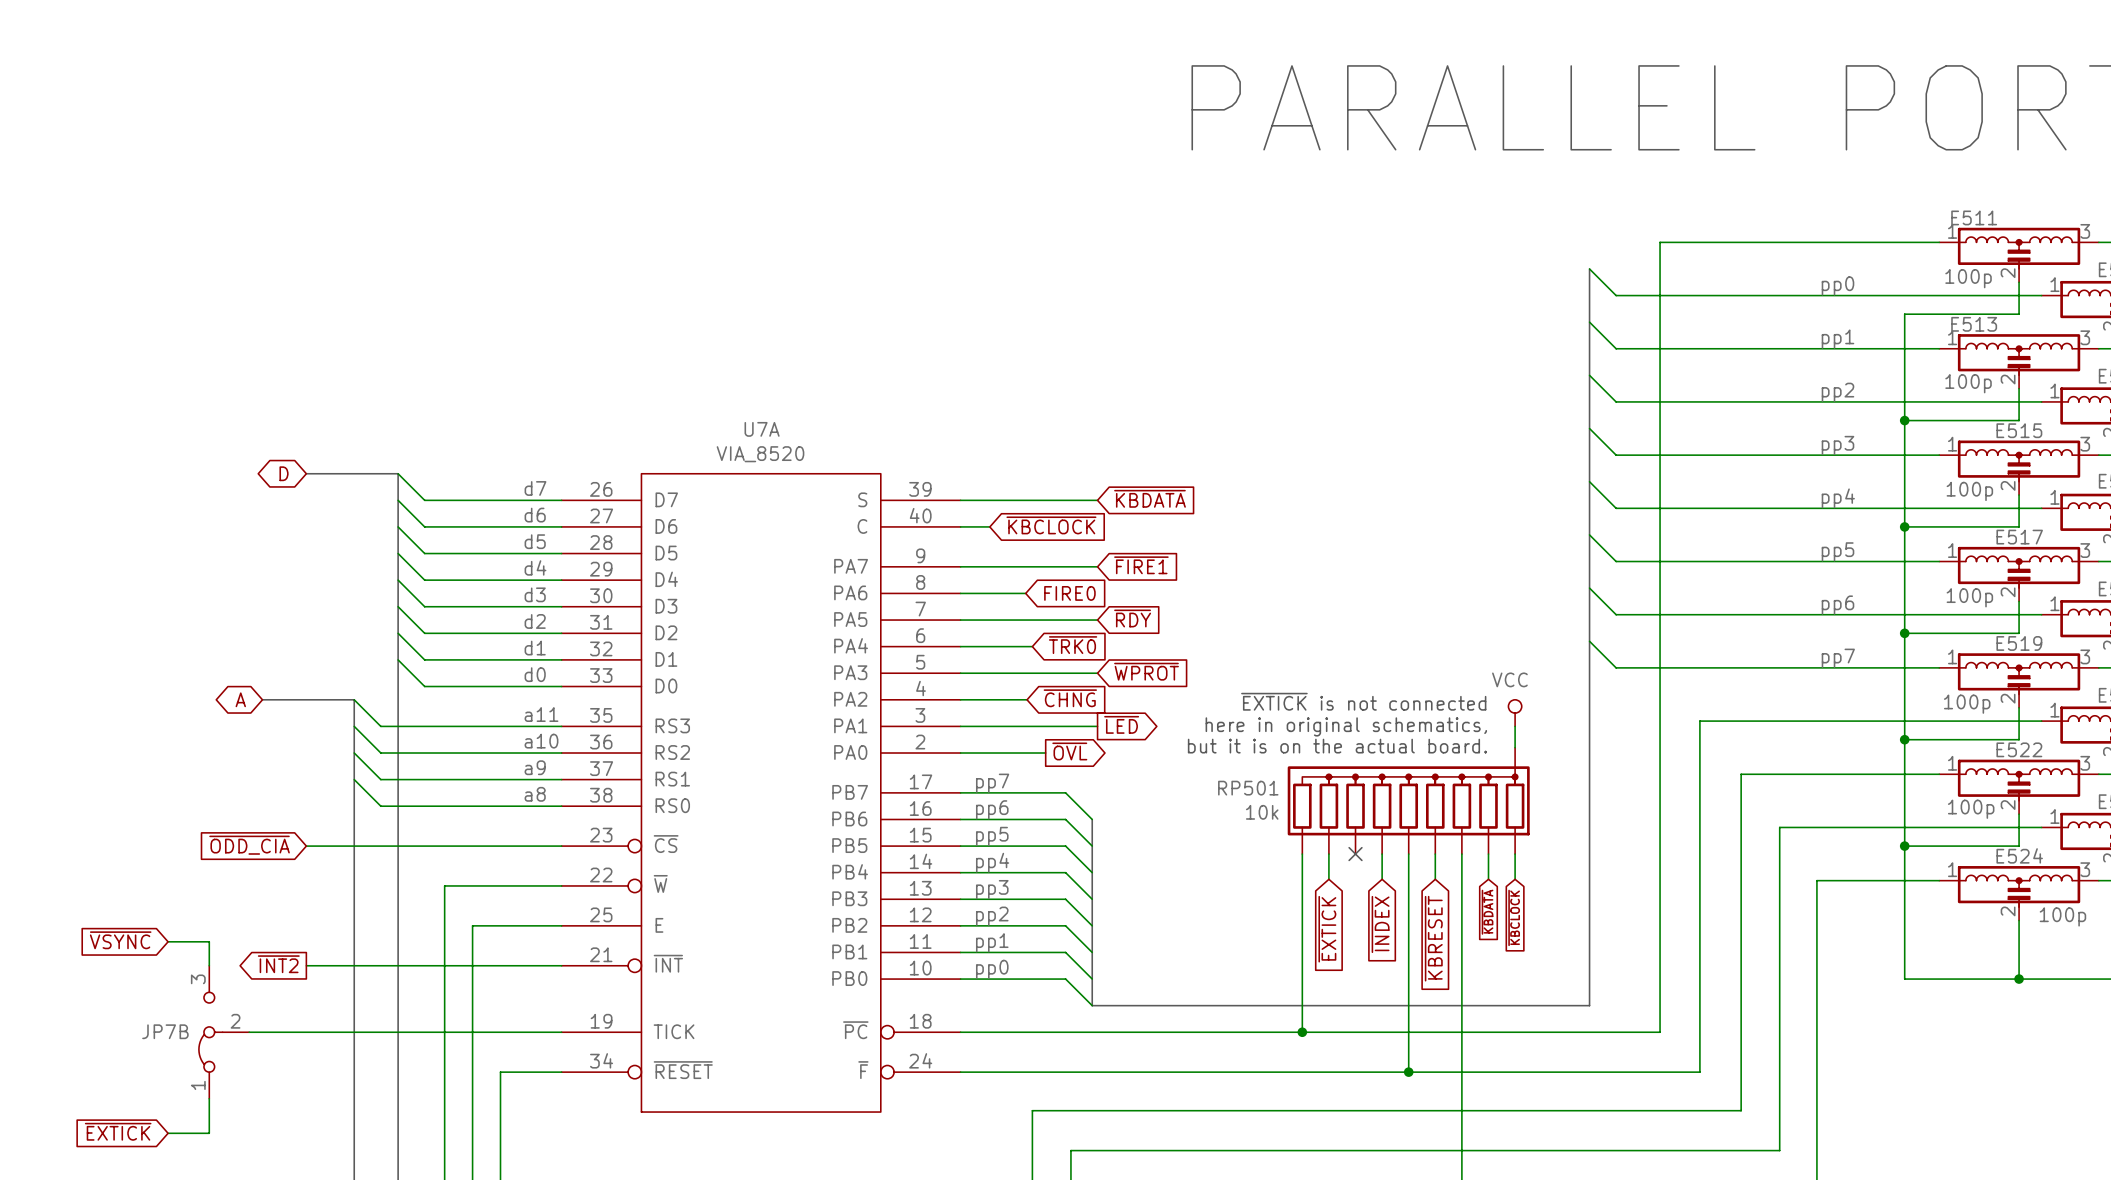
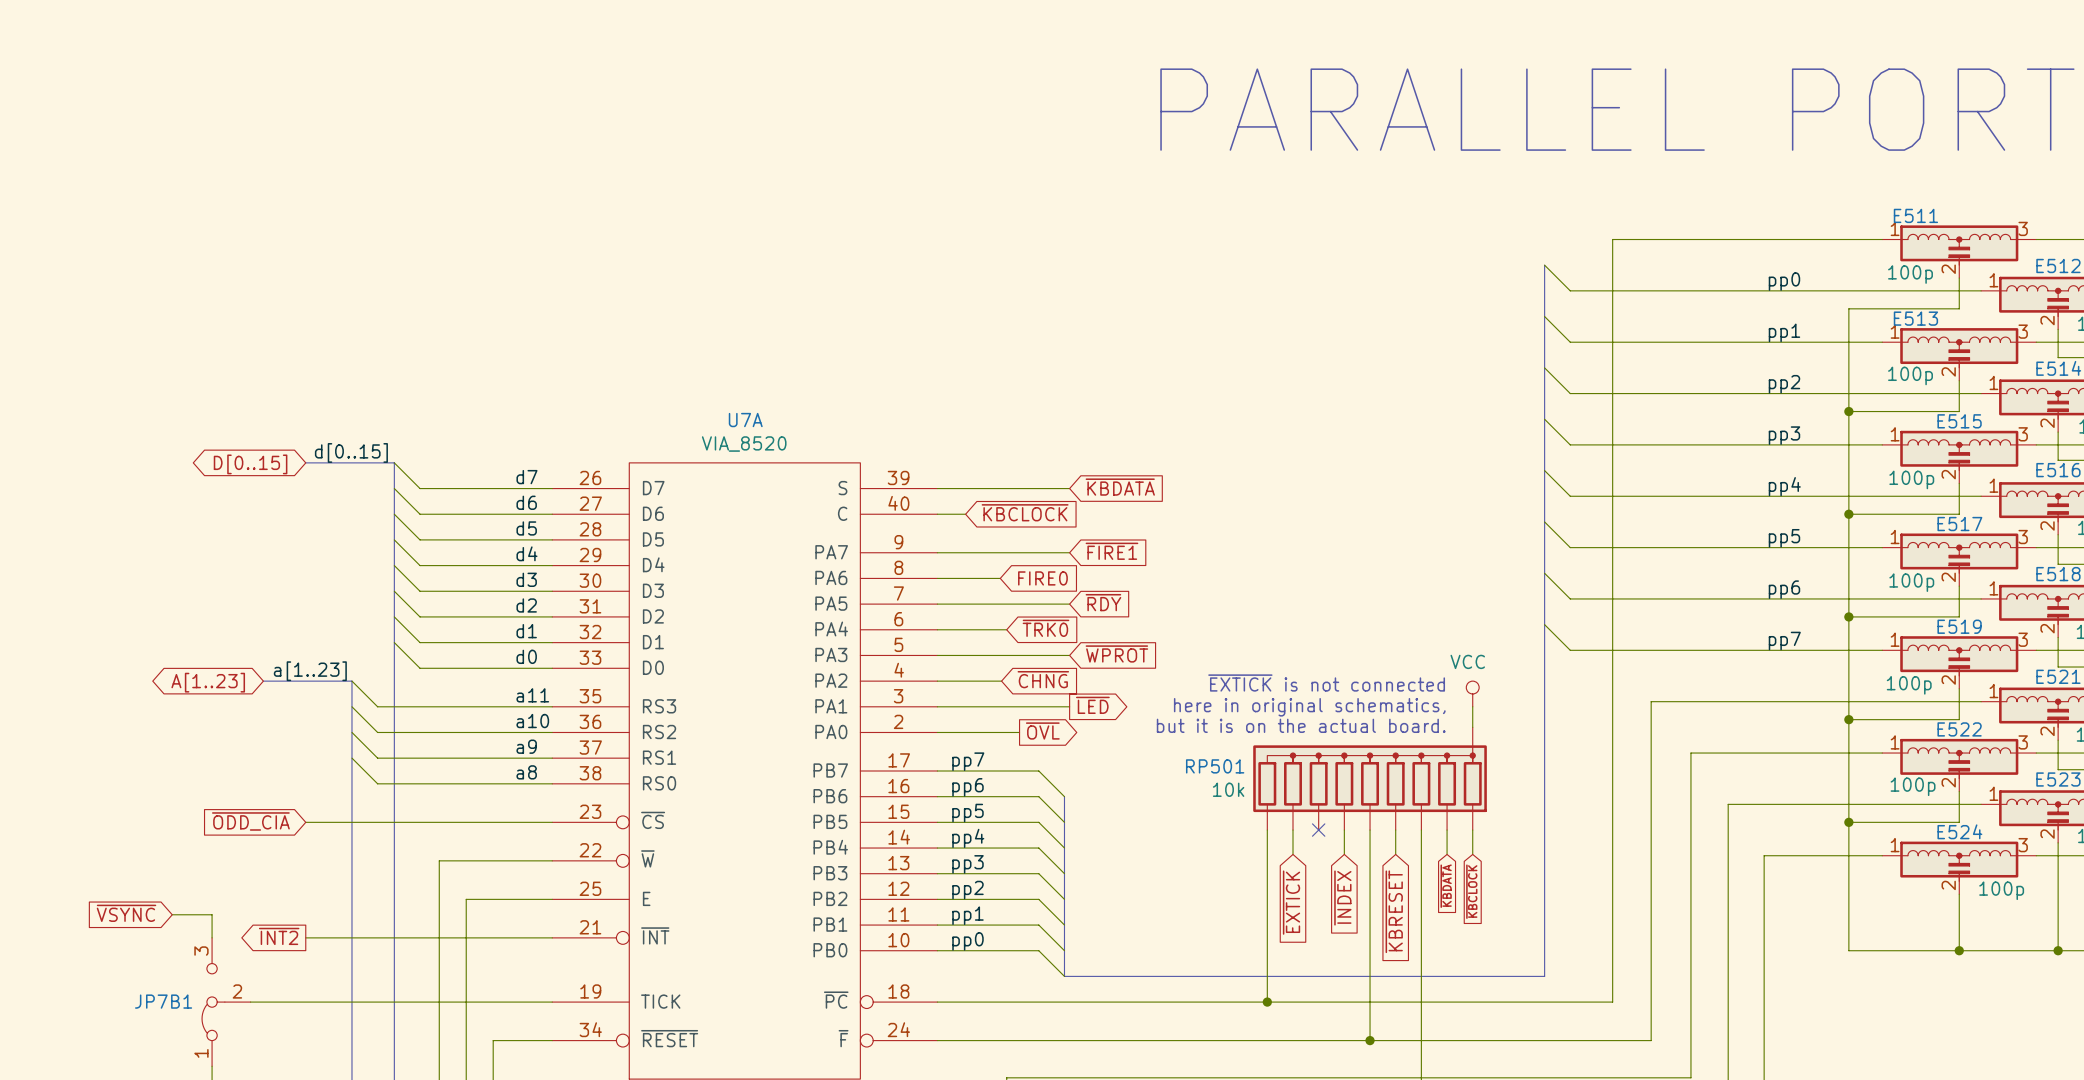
label: none -> d[0..15] (351, 452)
global label: D (284, 473) -> D[0..15] (250, 464)
label: none -> a[1..23] (310, 671)
global label: A (240, 699) -> A[1..23] (208, 682)
JP7B name: JP7B (165, 1031) -> JP7B1 (163, 1001)

